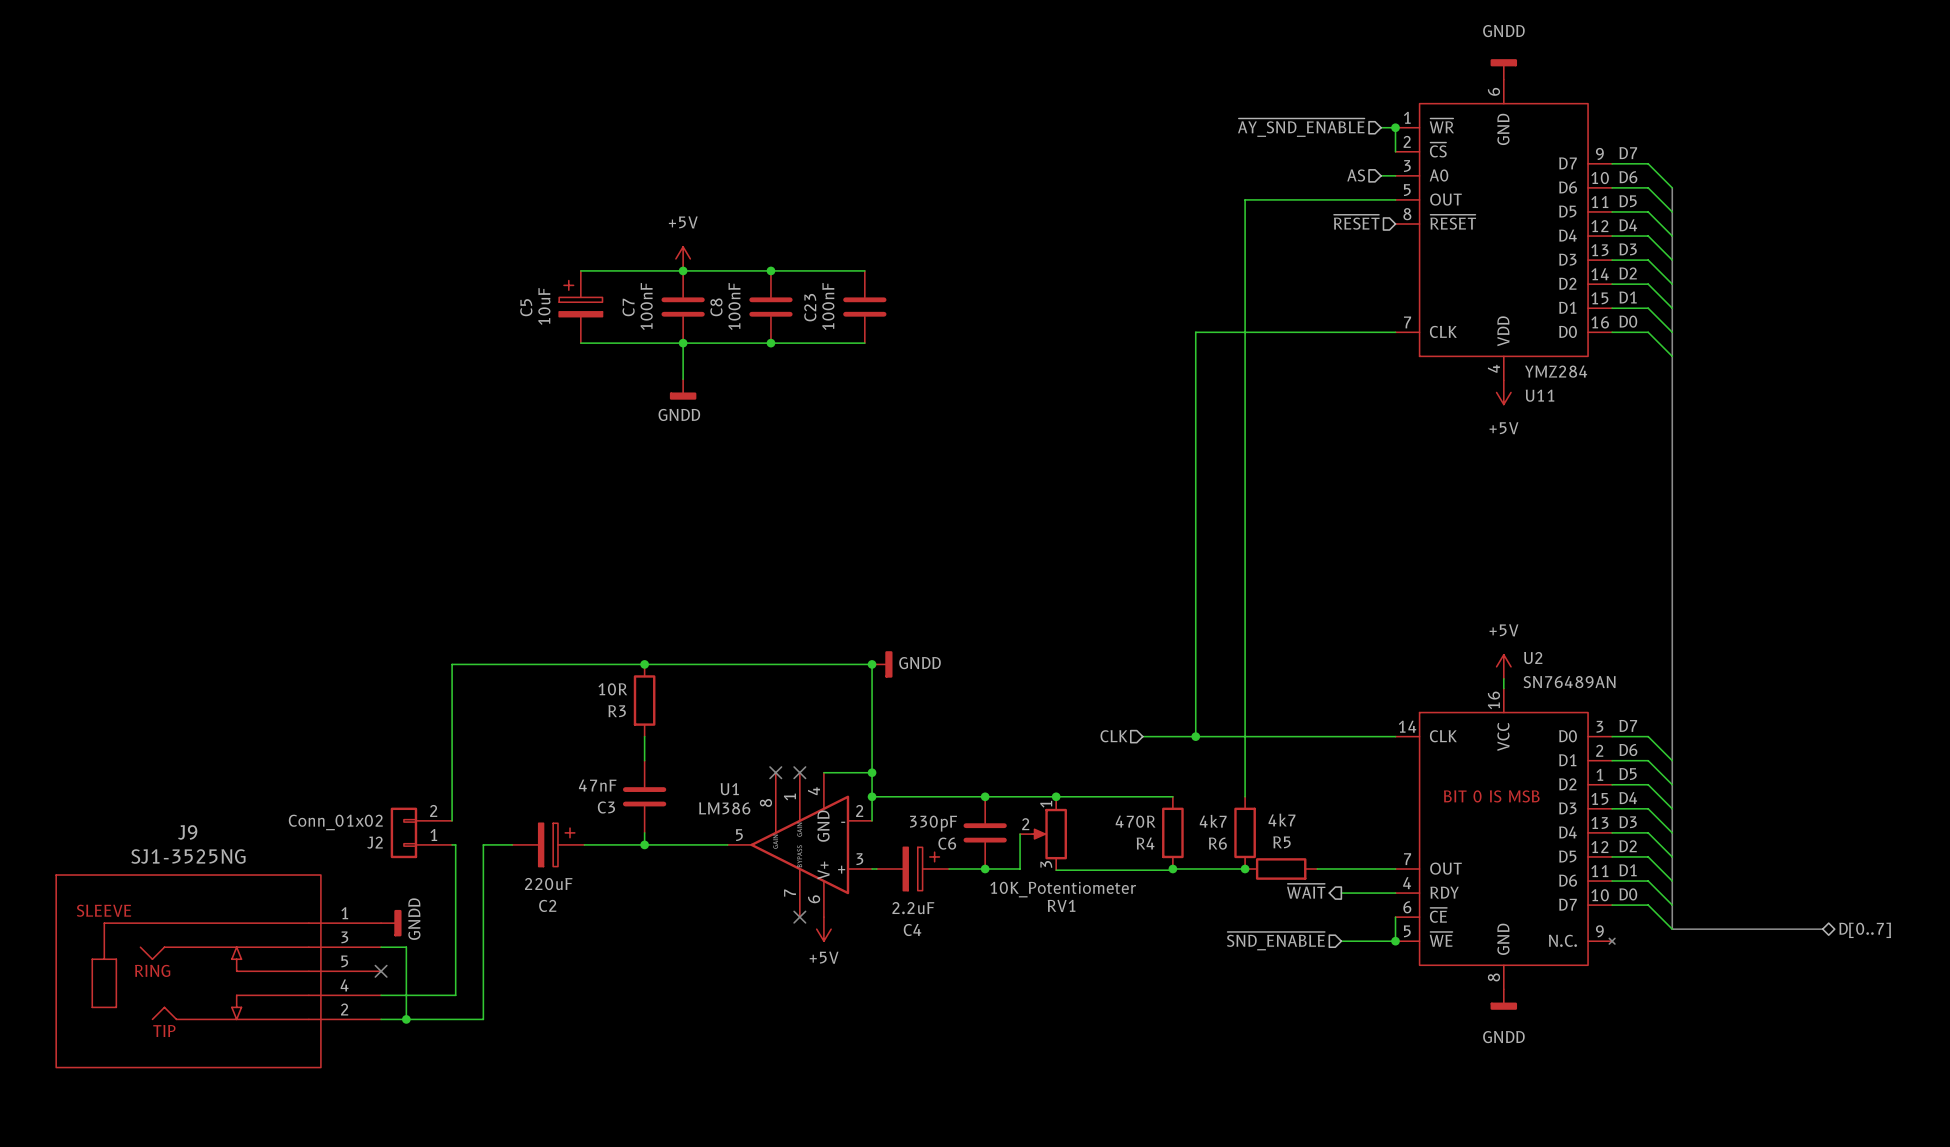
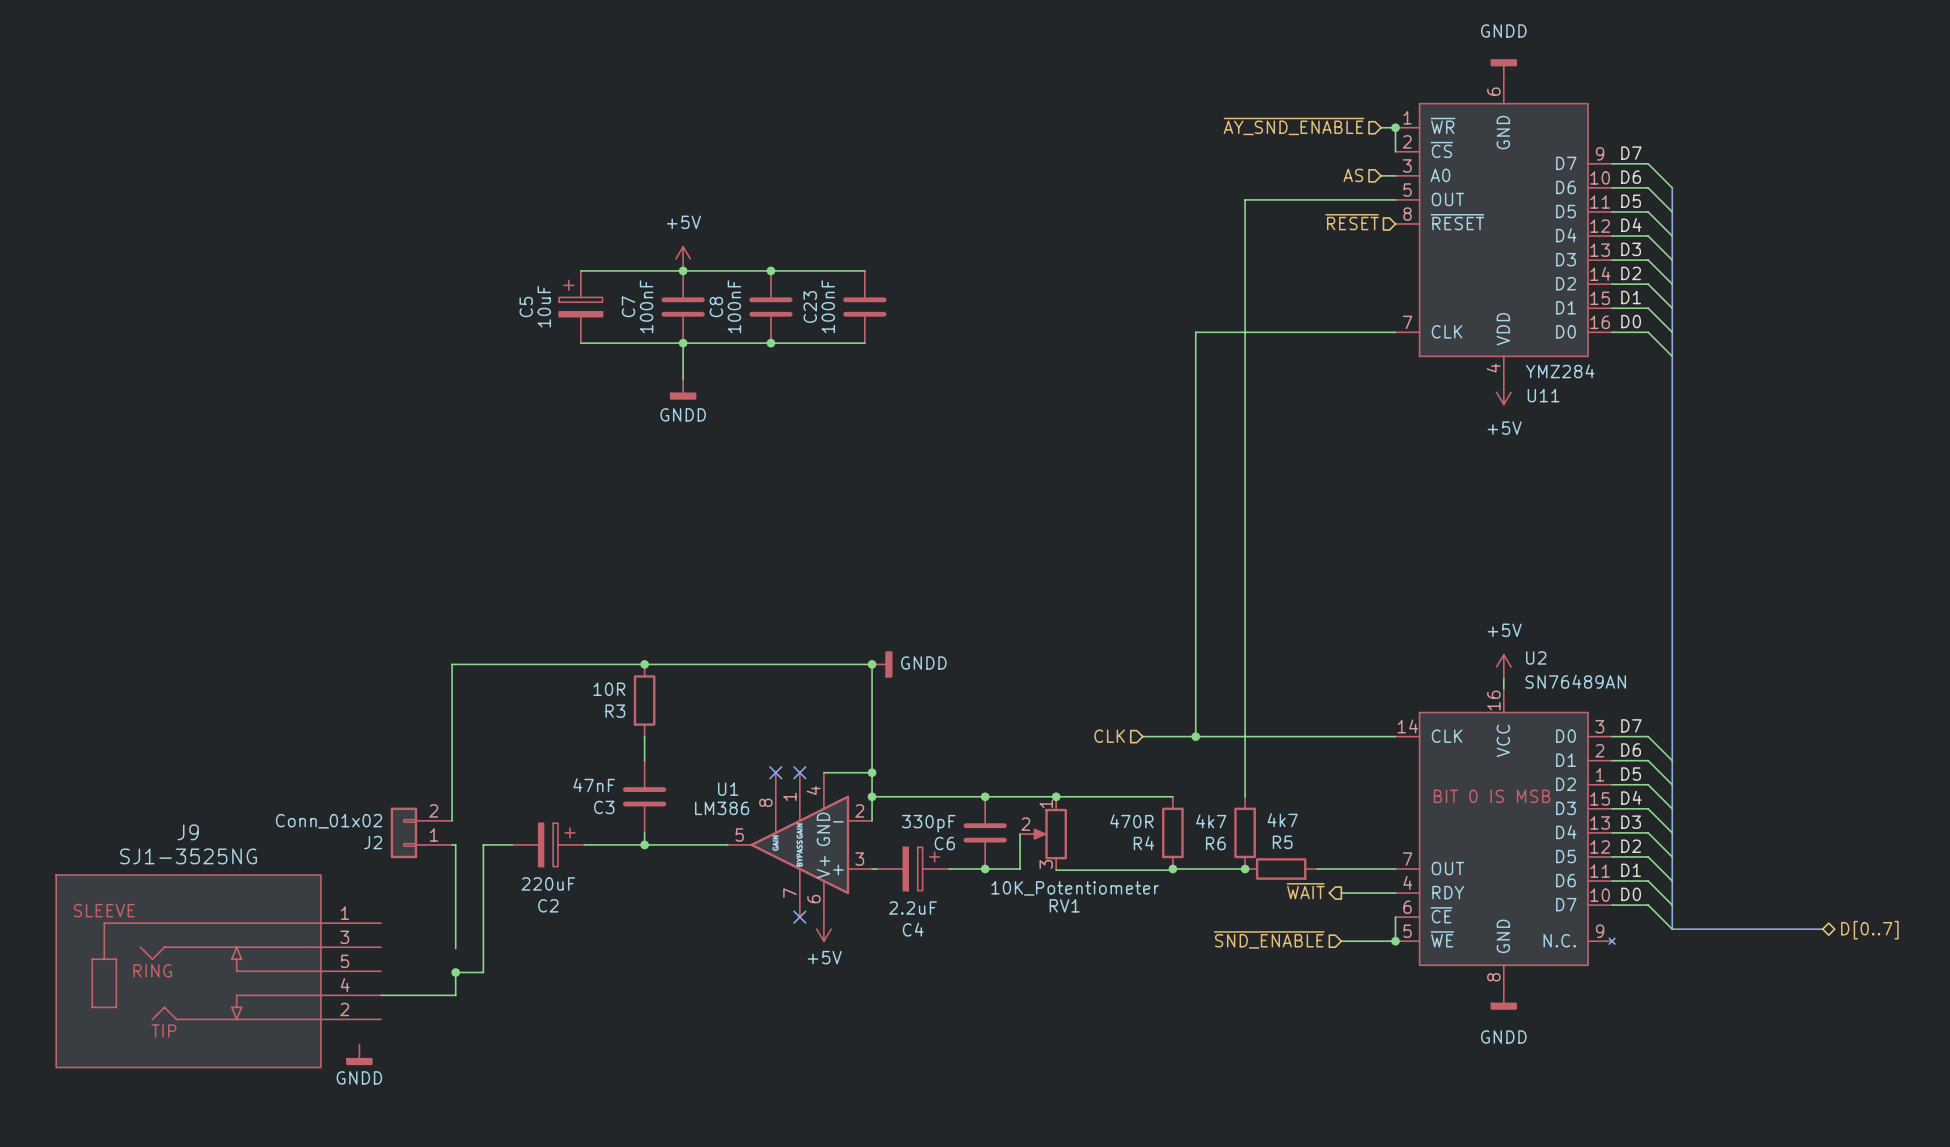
power symbol rotation: 0° (391, 923) -> 90° clockwise (359, 1054)
power symbol position: GNDD (391, 923) -> GNDD (359, 1054)
wire: (381, 947) (406, 947) (406, 1019) -> none
wire: (455, 948) (455, 972) -> (483, 972) (455, 972)
no-connect mark: (381, 971) -> none
junction: none -> (455, 972)
wire: (483, 972) (483, 1019) (381, 1019) -> none
junction: (406, 1019) -> none

